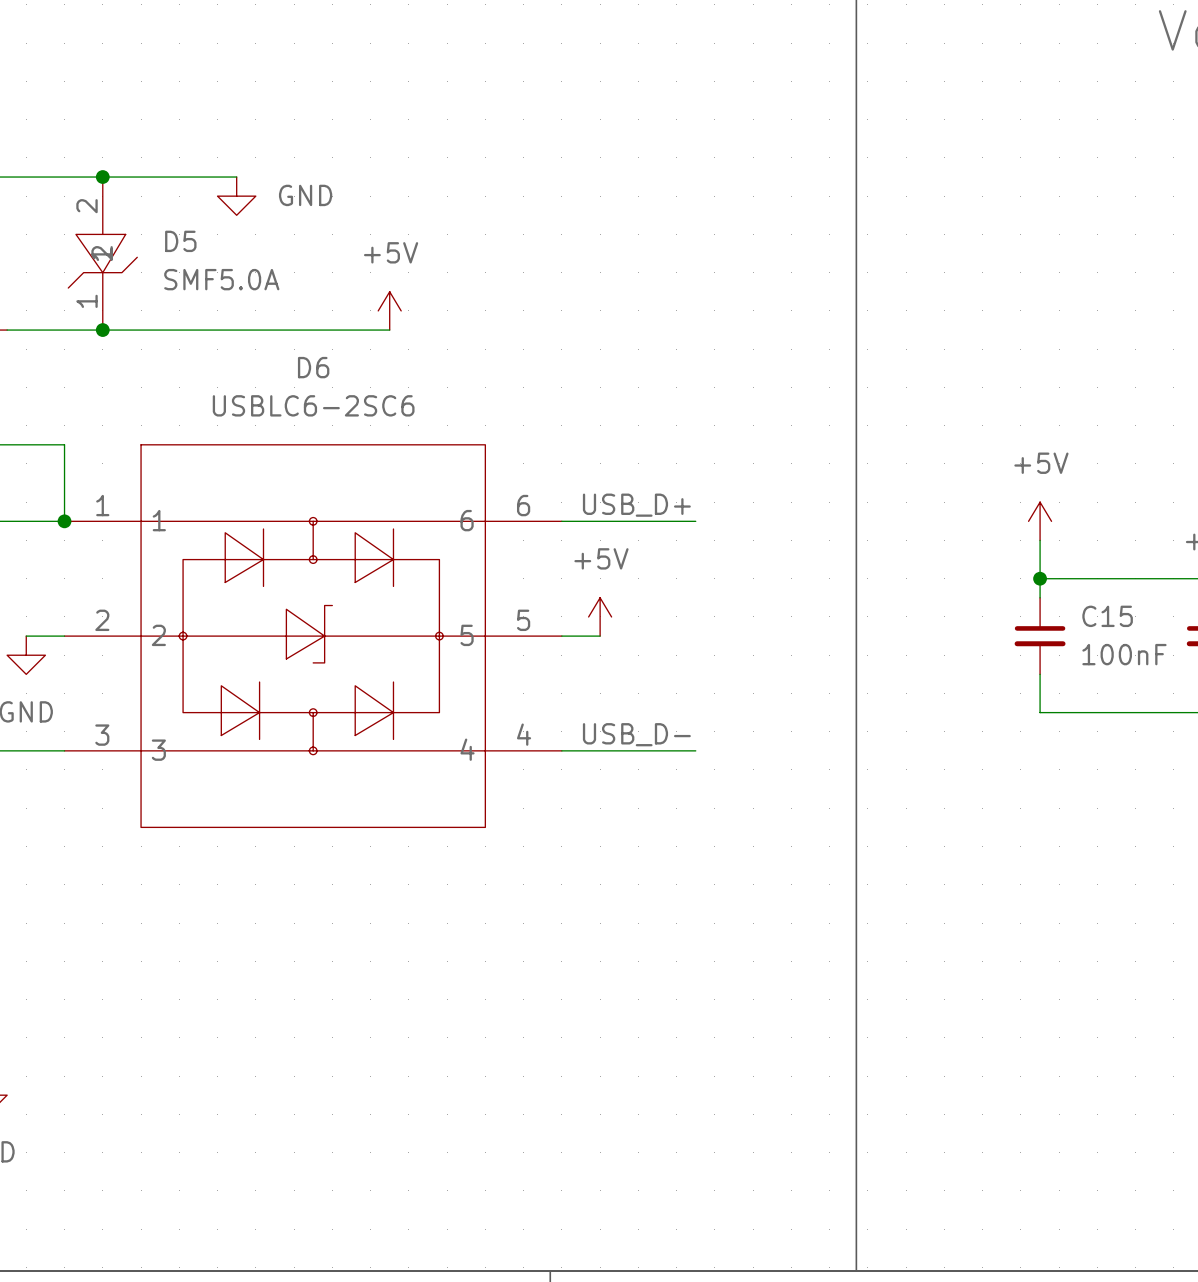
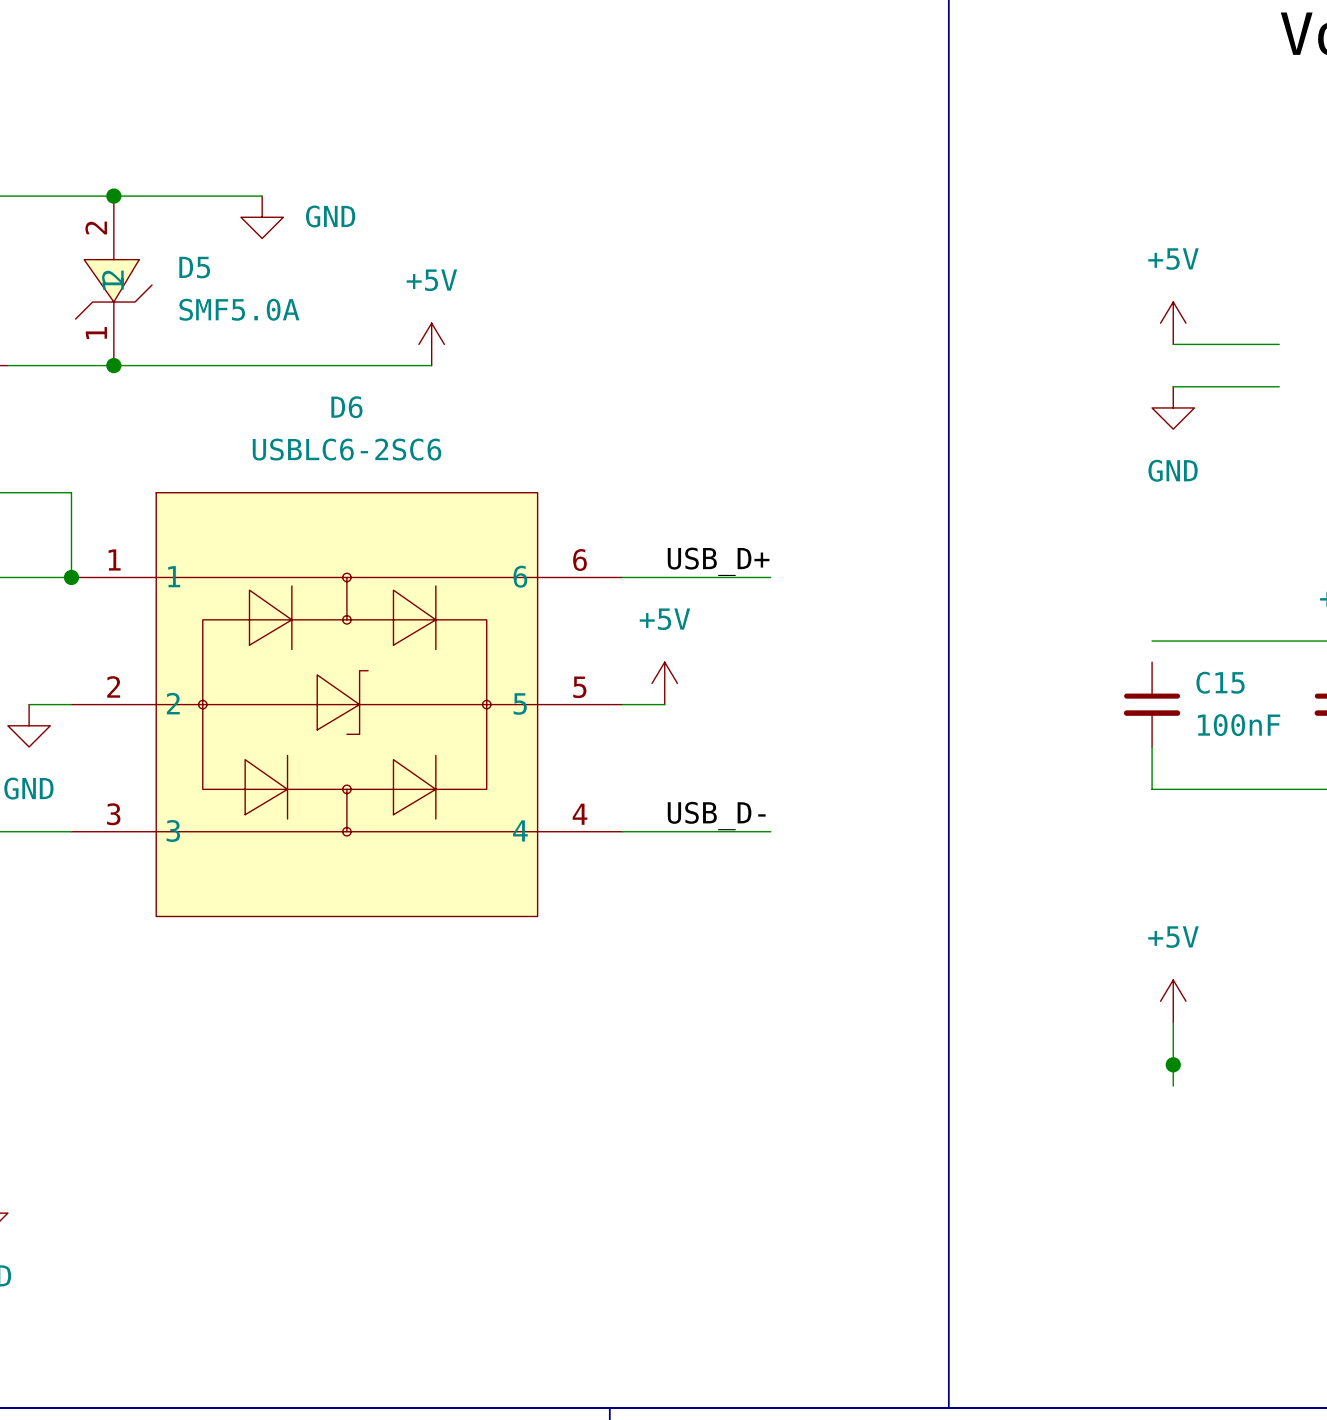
power symbol: none -> +5V (1173, 323)
wire: none -> (1173, 344) (1279, 344)
wire: none -> (1173, 386) (1279, 386)
power symbol: none -> GND (1173, 407)
power symbol: +5V (1040, 521) -> none
wire: (1040, 540) (1040, 597) -> none
junction: (1040, 578) -> none
power symbol: none -> +5V (1173, 1001)
wire: none -> (1173, 1022) (1173, 1085)
junction: none -> (1173, 1064)

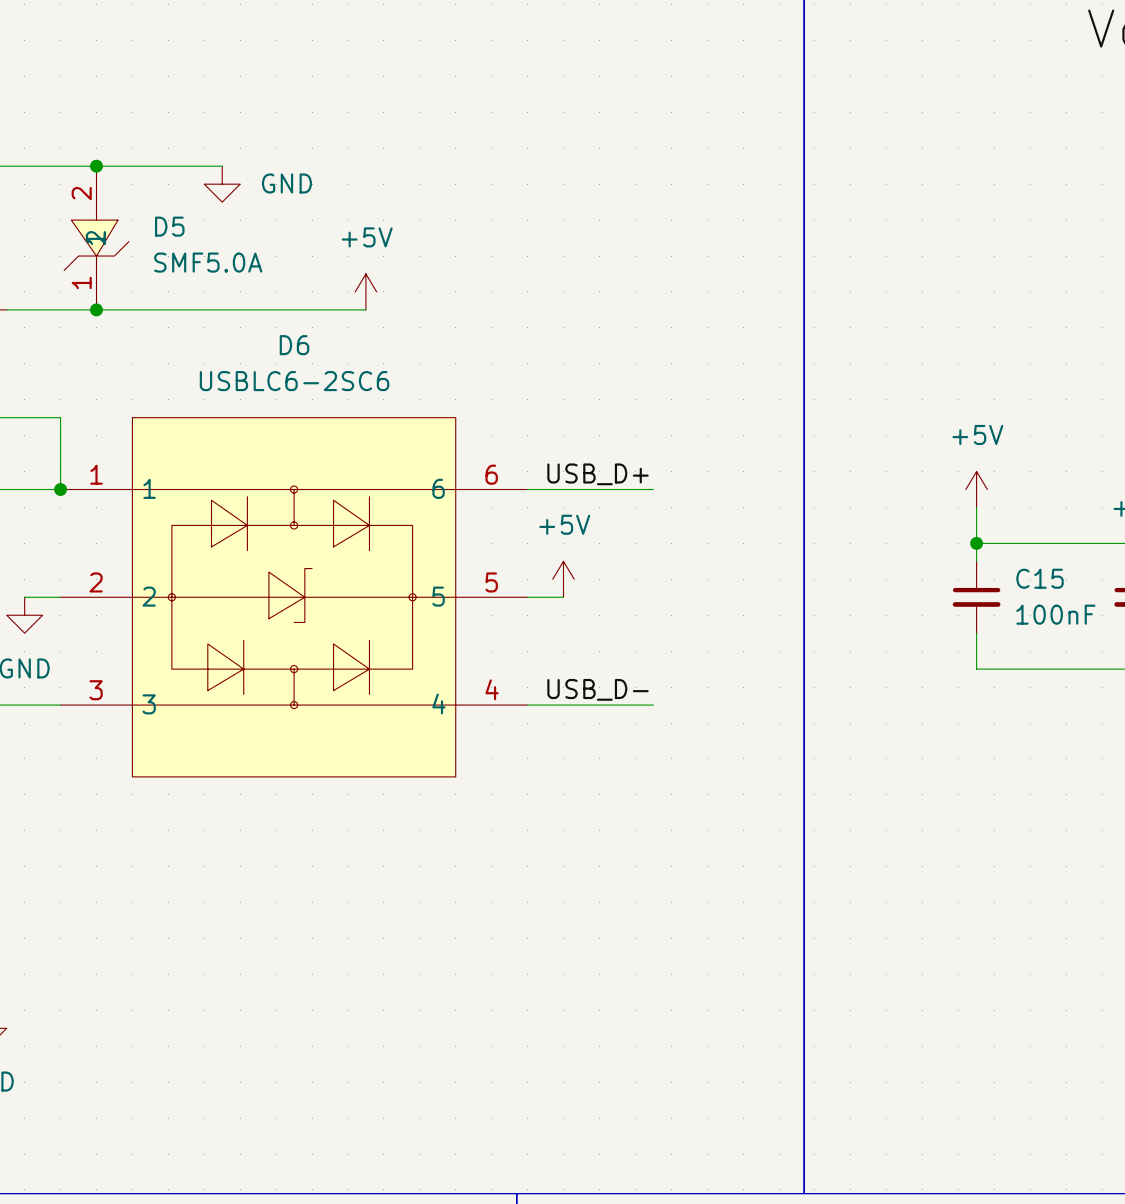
power symbol: +5V (1173, 323) -> none
wire: (1173, 344) (1279, 344) -> none
wire: (1173, 386) (1279, 386) -> none
power symbol: GND (1173, 407) -> none
power symbol: none -> +5V (976, 489)
wire: none -> (976, 507) (976, 561)
junction: none -> (976, 543)
power symbol: +5V (1173, 1001) -> none
wire: (1173, 1022) (1173, 1085) -> none
junction: (1173, 1064) -> none

